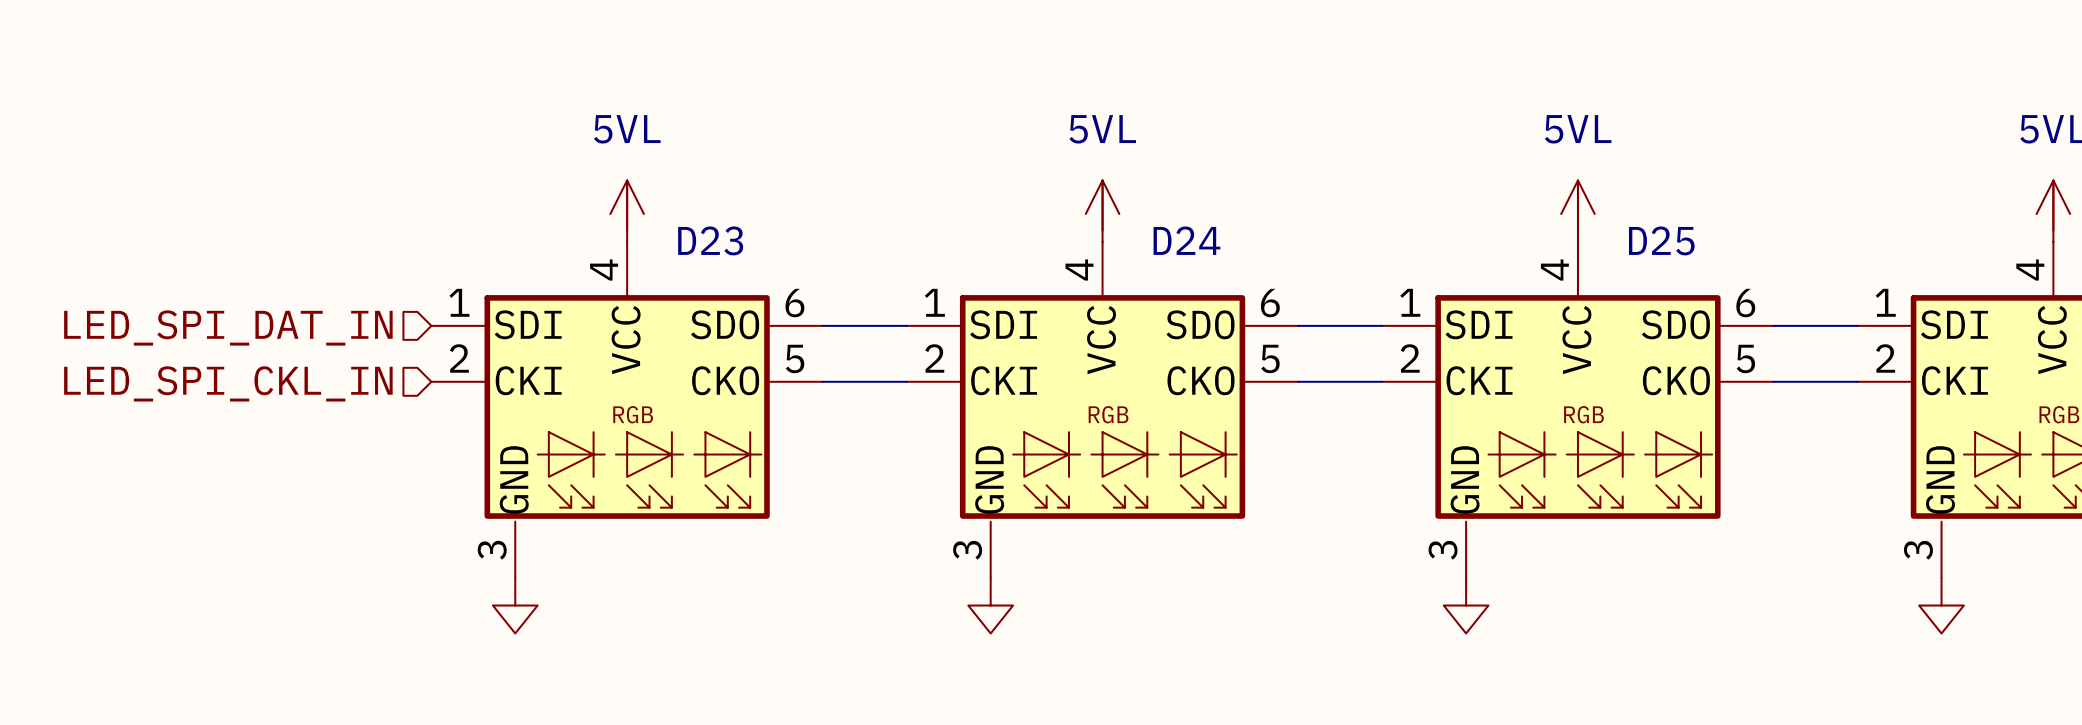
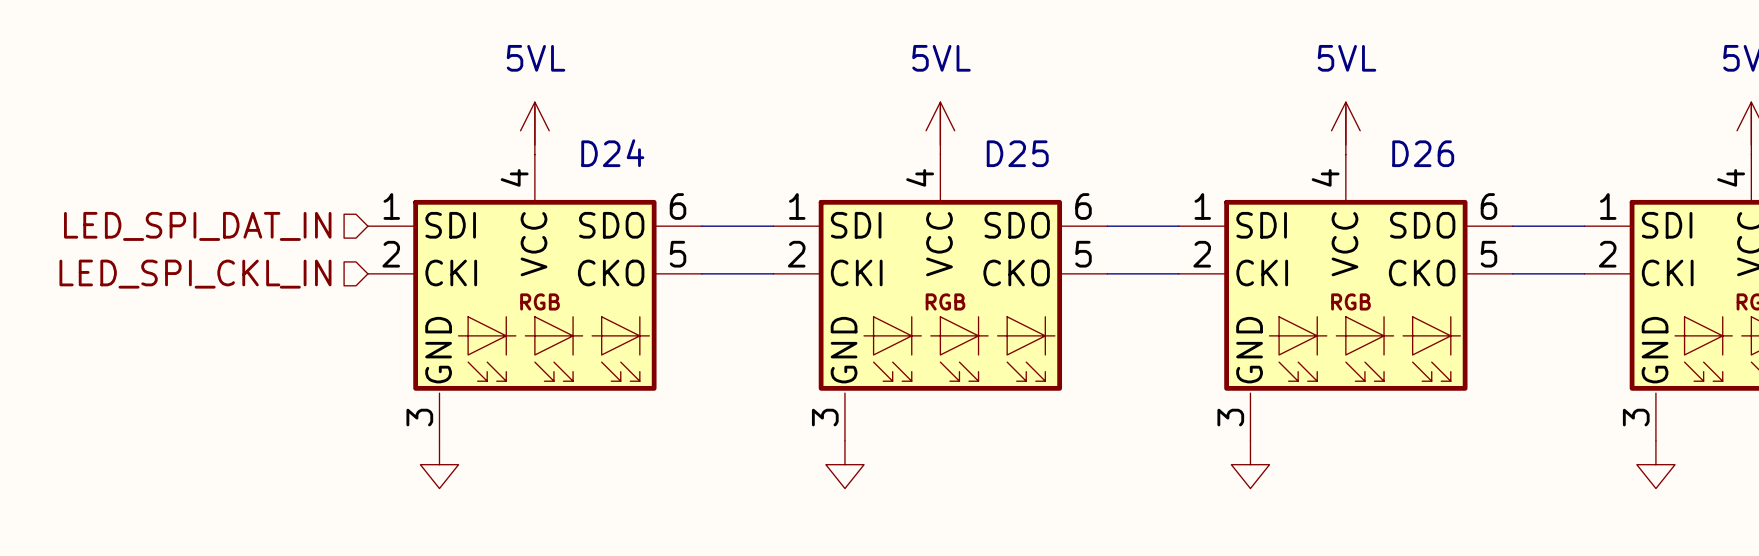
D23 name: D23 (710, 240) -> D24 (612, 153)
D24 name: D24 (1186, 240) -> D25 (1017, 153)
D25 name: D25 (1661, 240) -> D26 (1423, 153)

